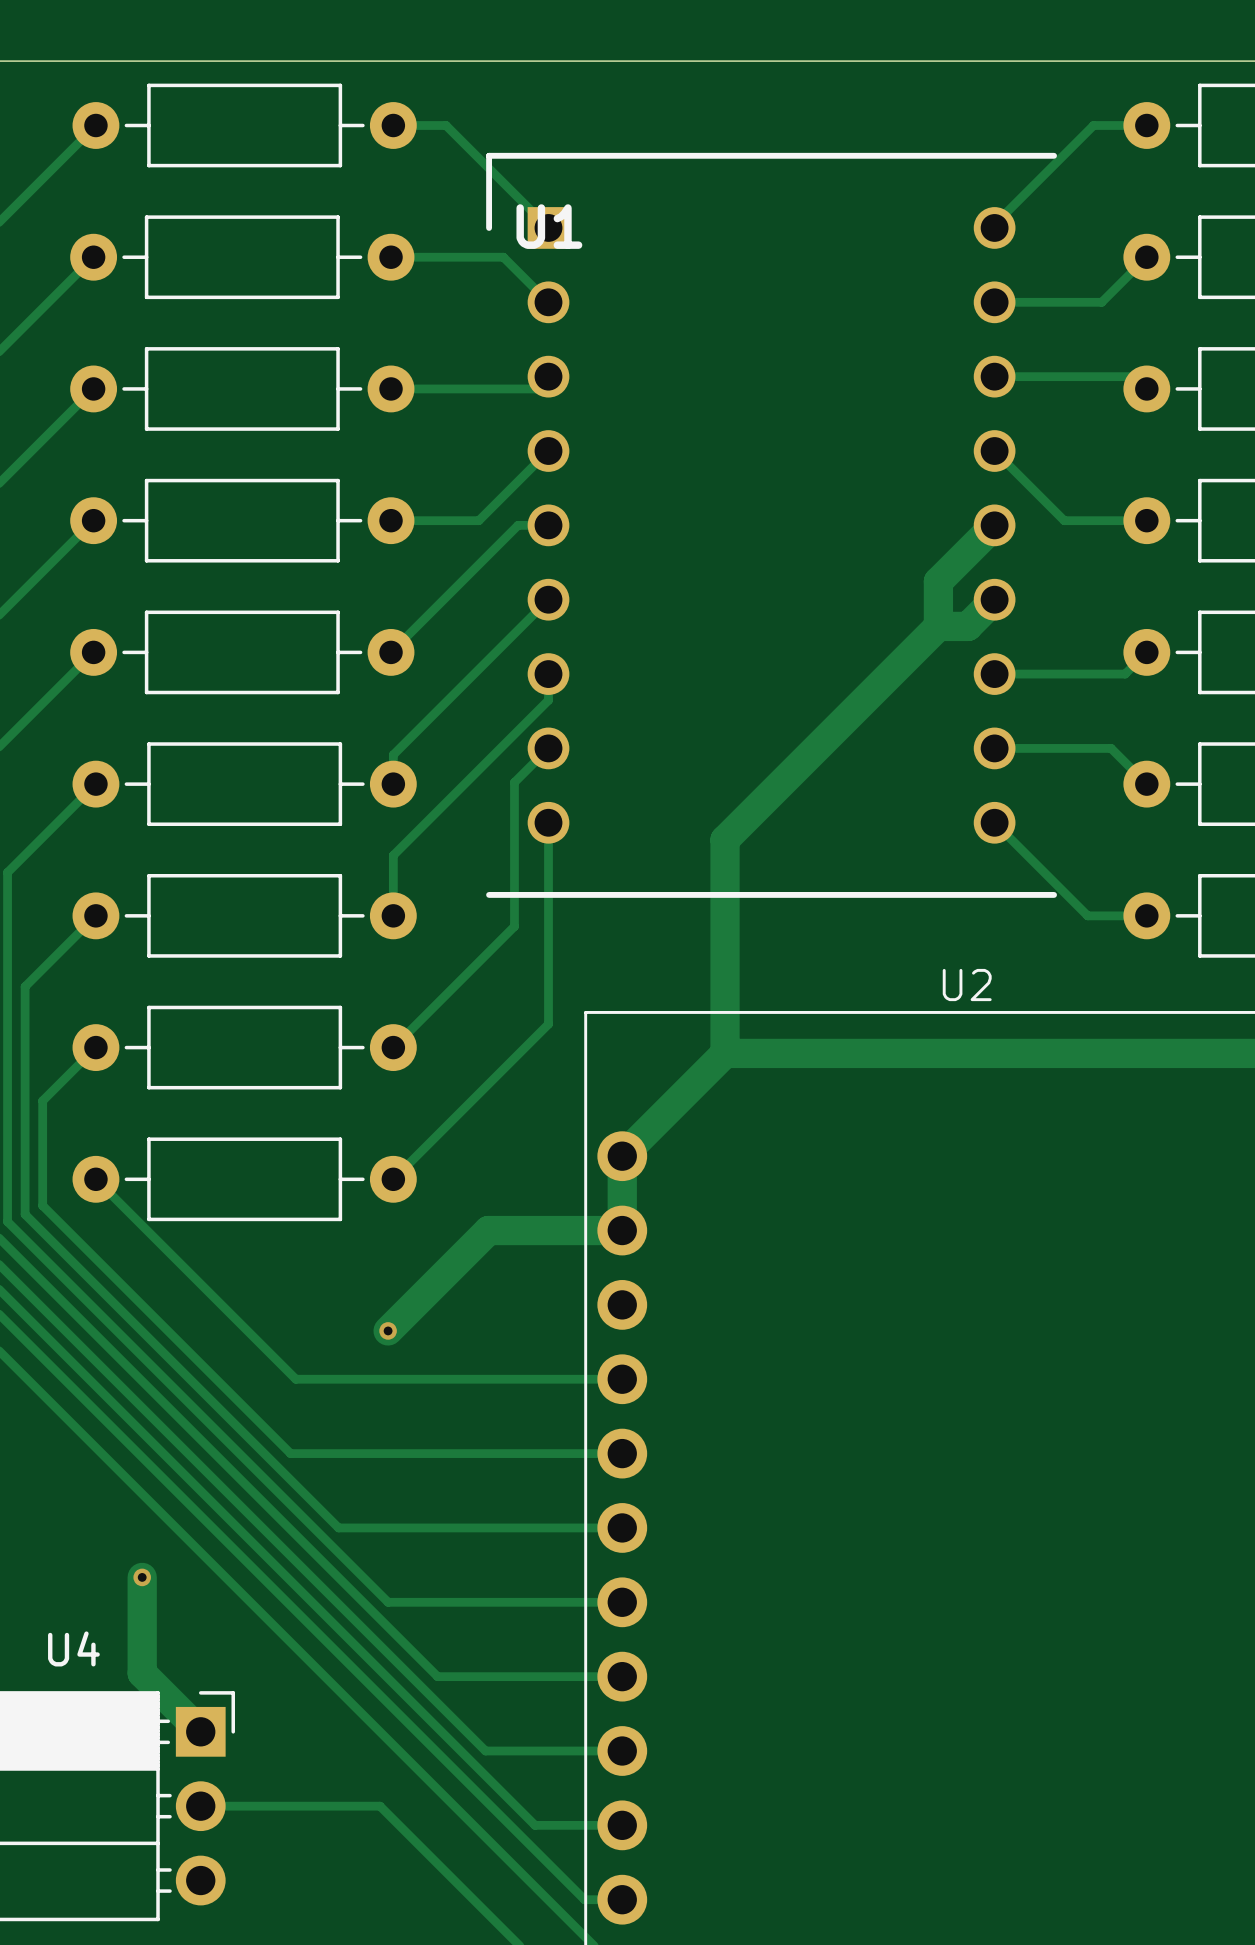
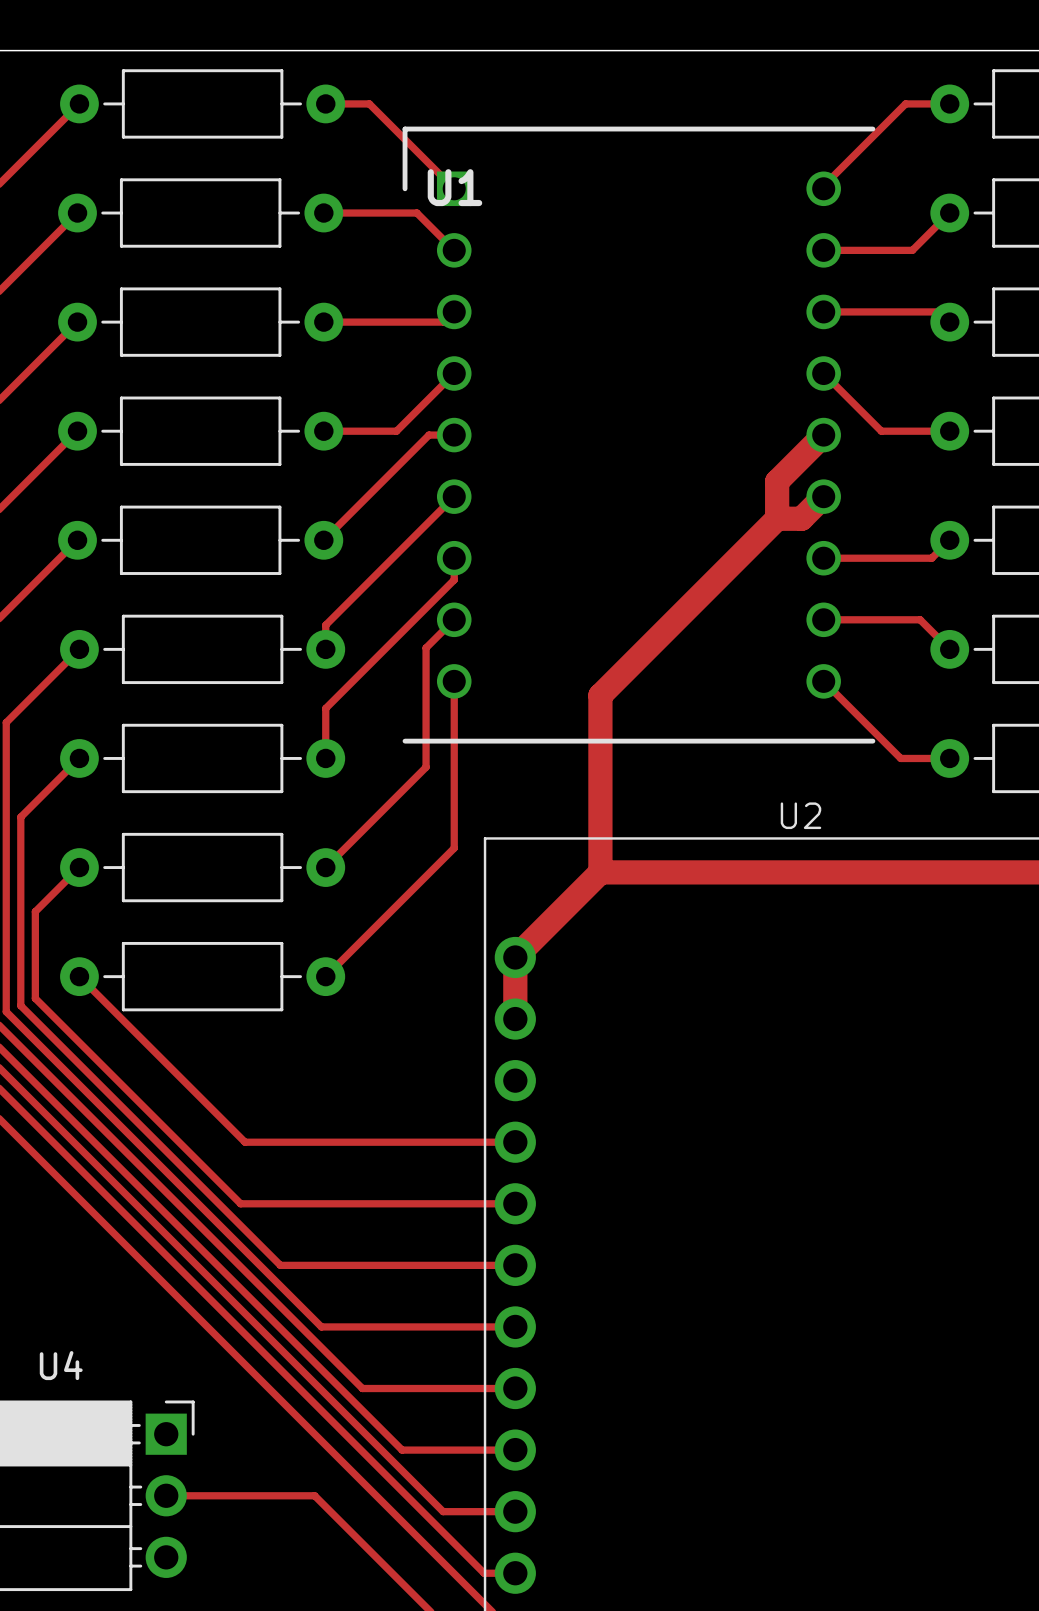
track: (622, 1230) (488, 1230) (388, 1330) -> none
via: (388, 1330) -> none
track: (142, 1577) (142, 1673) (200, 1731) -> none
via: (142, 1577) -> none

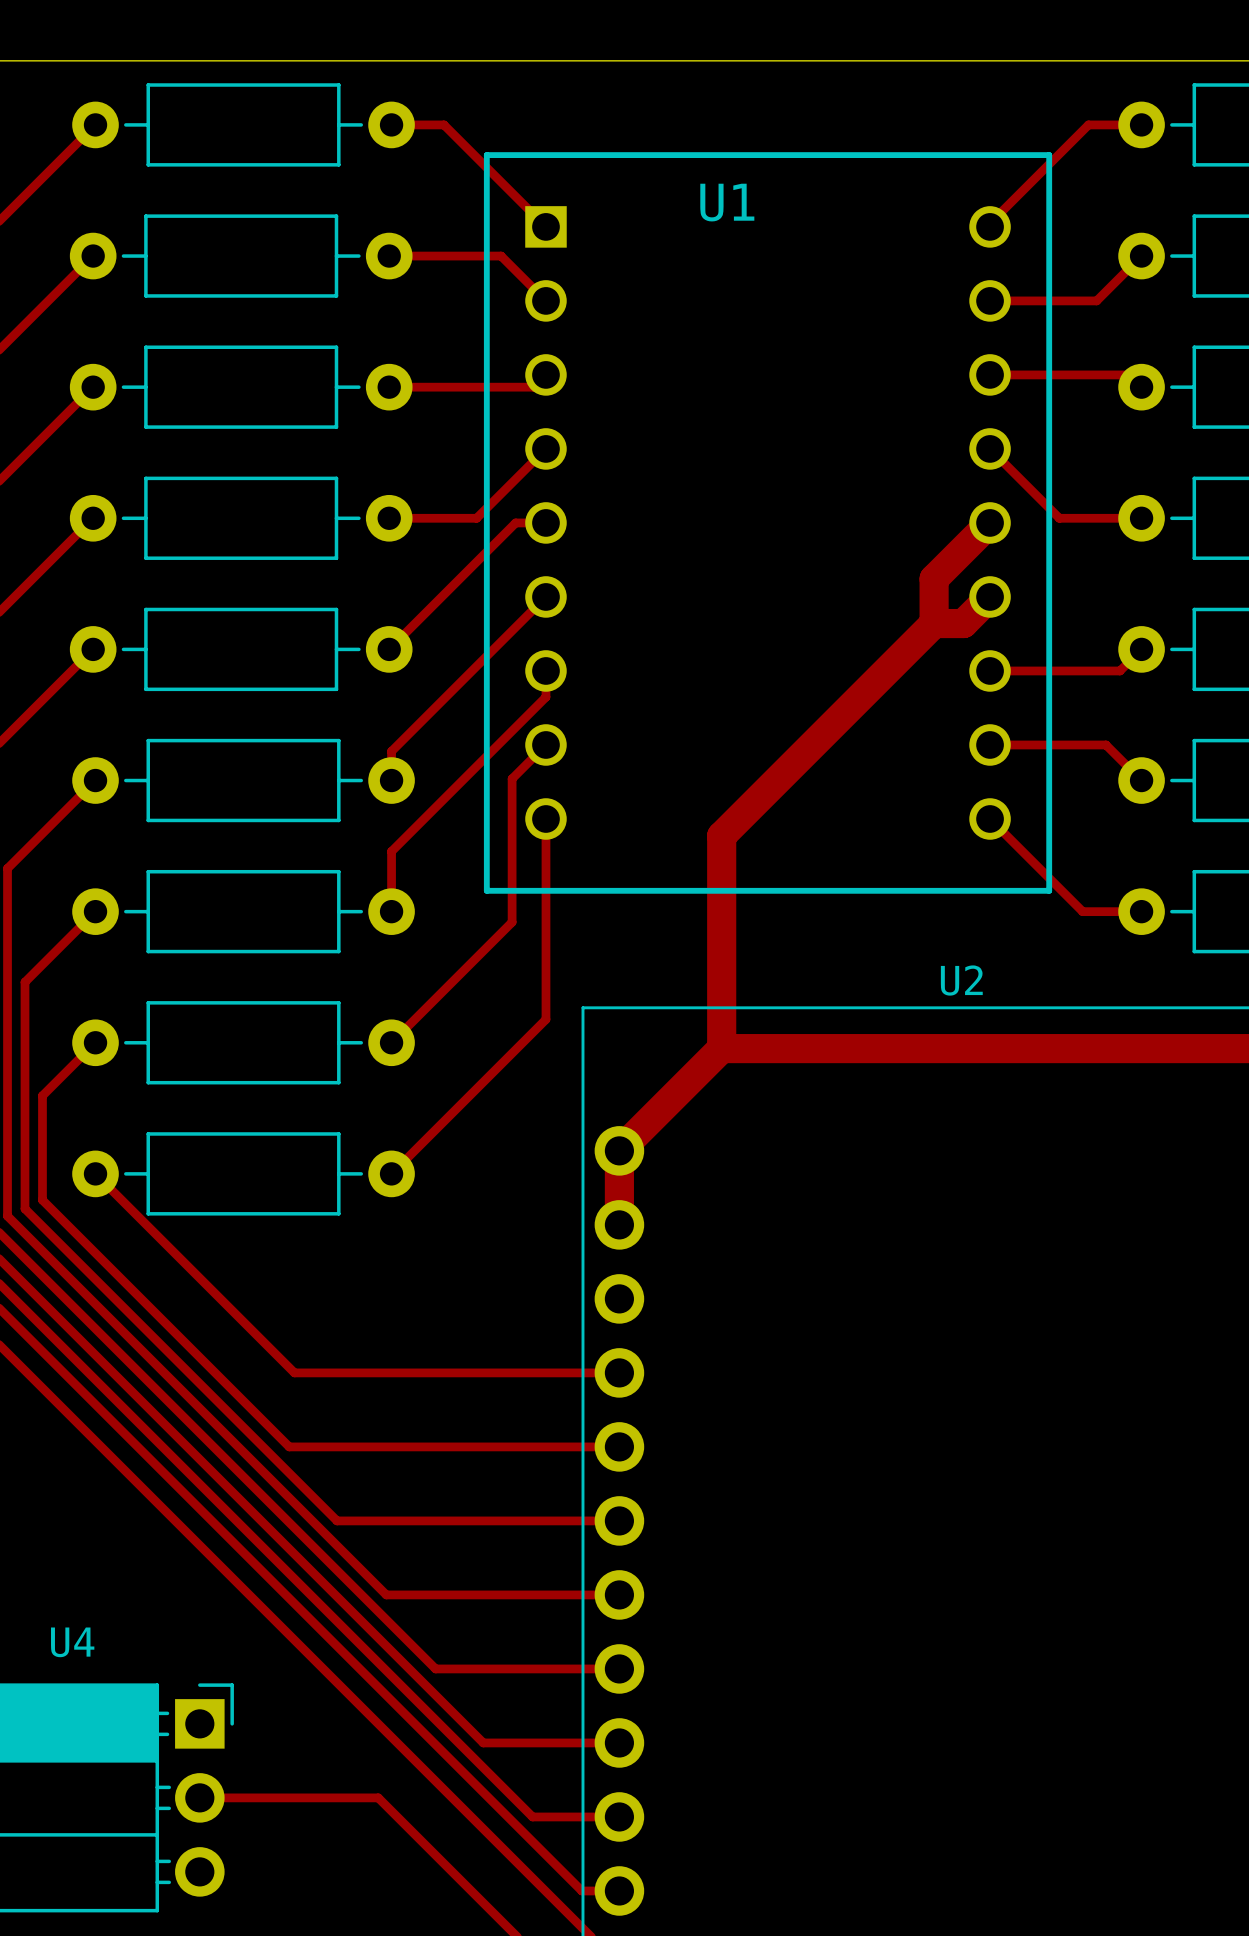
U1 footprint: [402, 126, 876, 744] -> [483, 152, 1053, 894]
U1 name position: U1 (454, 187) -> U1 (727, 202)

